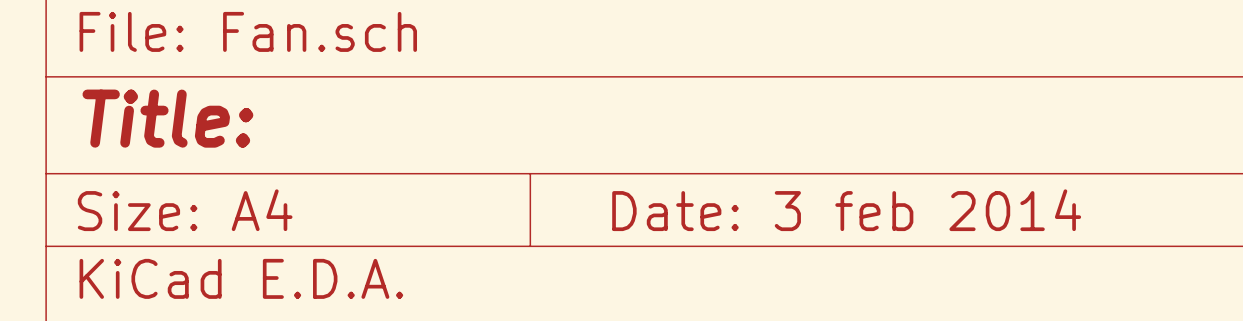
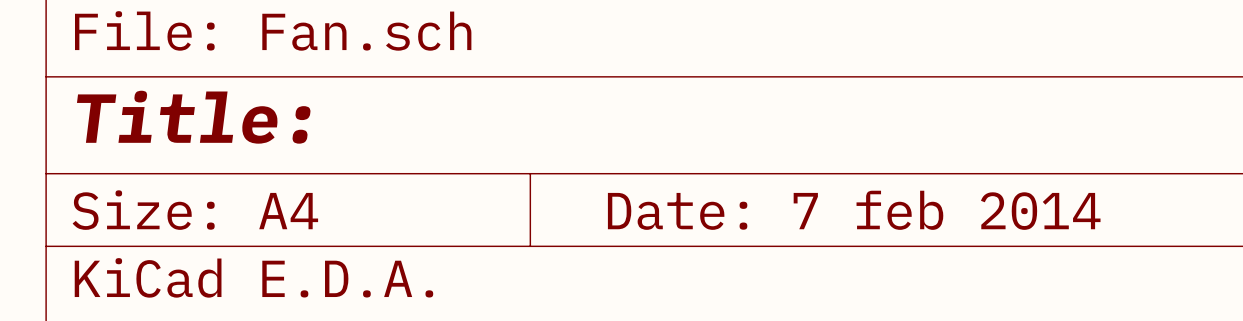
title block: Date: 3 feb 2014 (846, 210) -> Date: 7 feb 2014 (854, 210)

